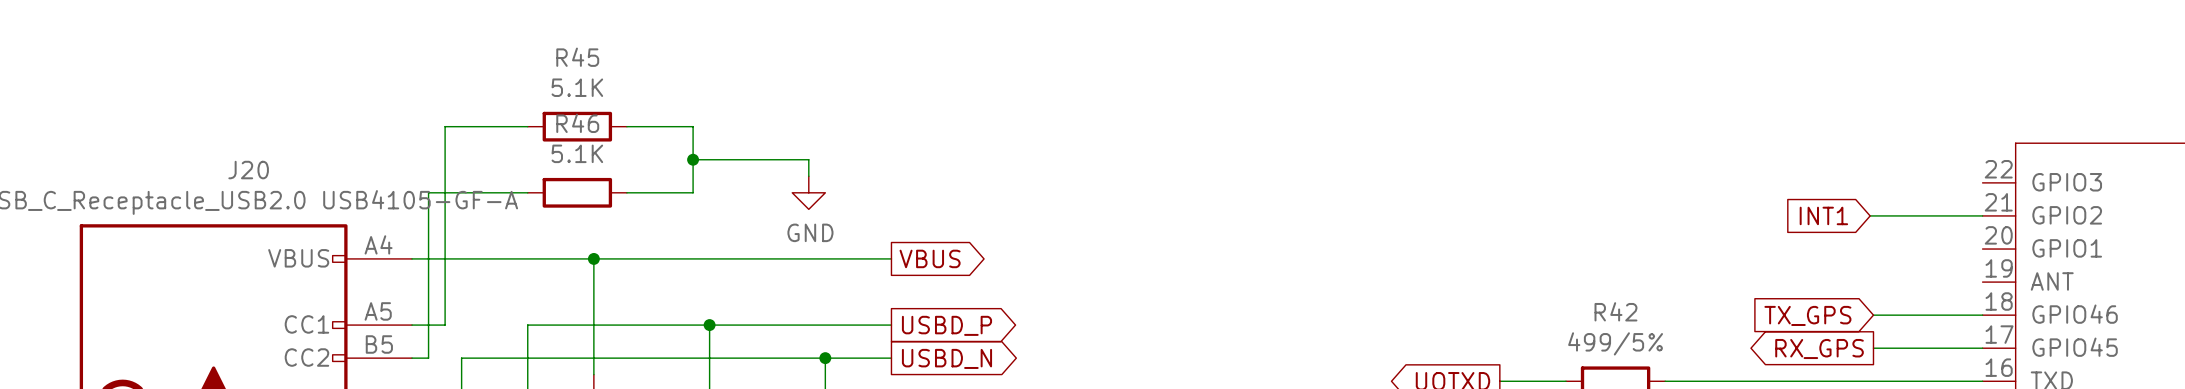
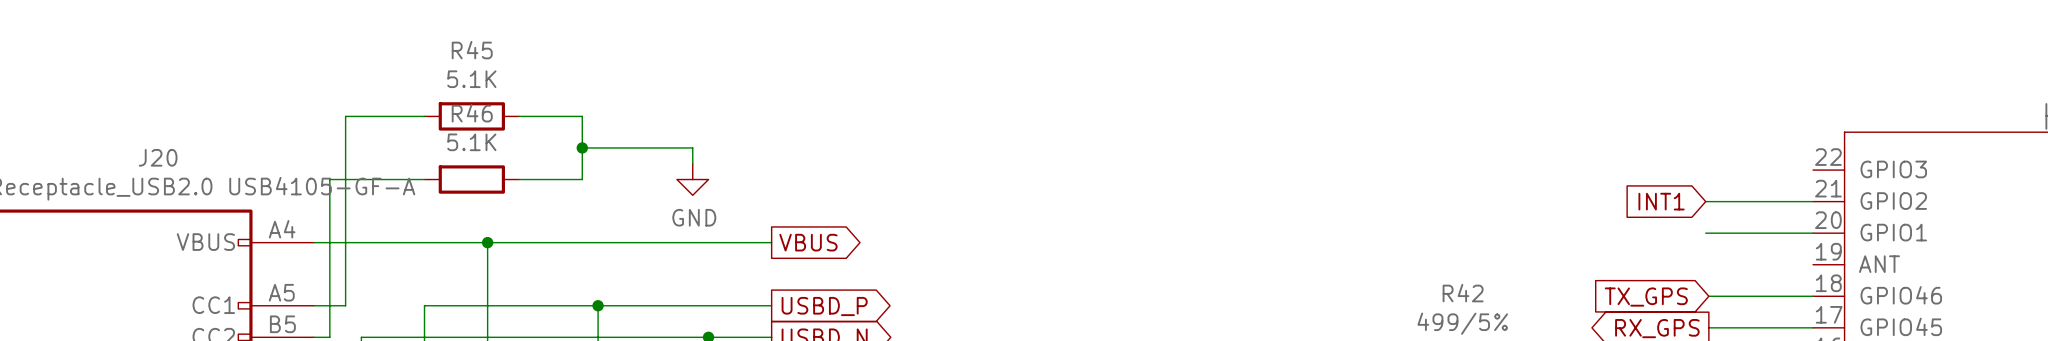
wire: none -> (1705, 233) (1813, 233)

